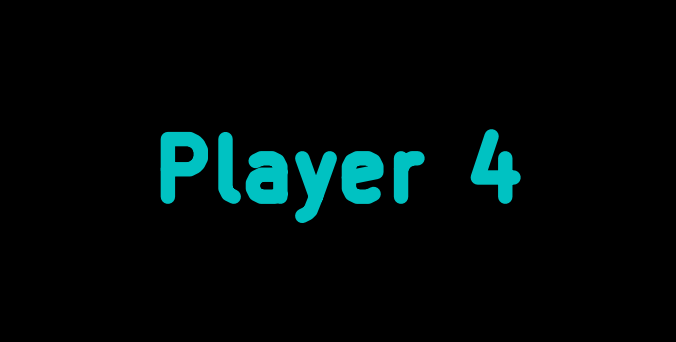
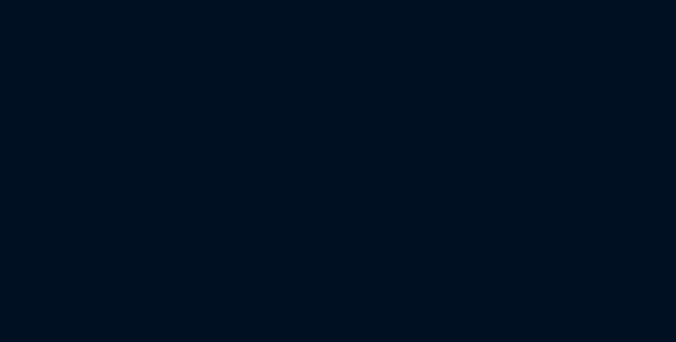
text: Player 4 (340, 176) -> none

